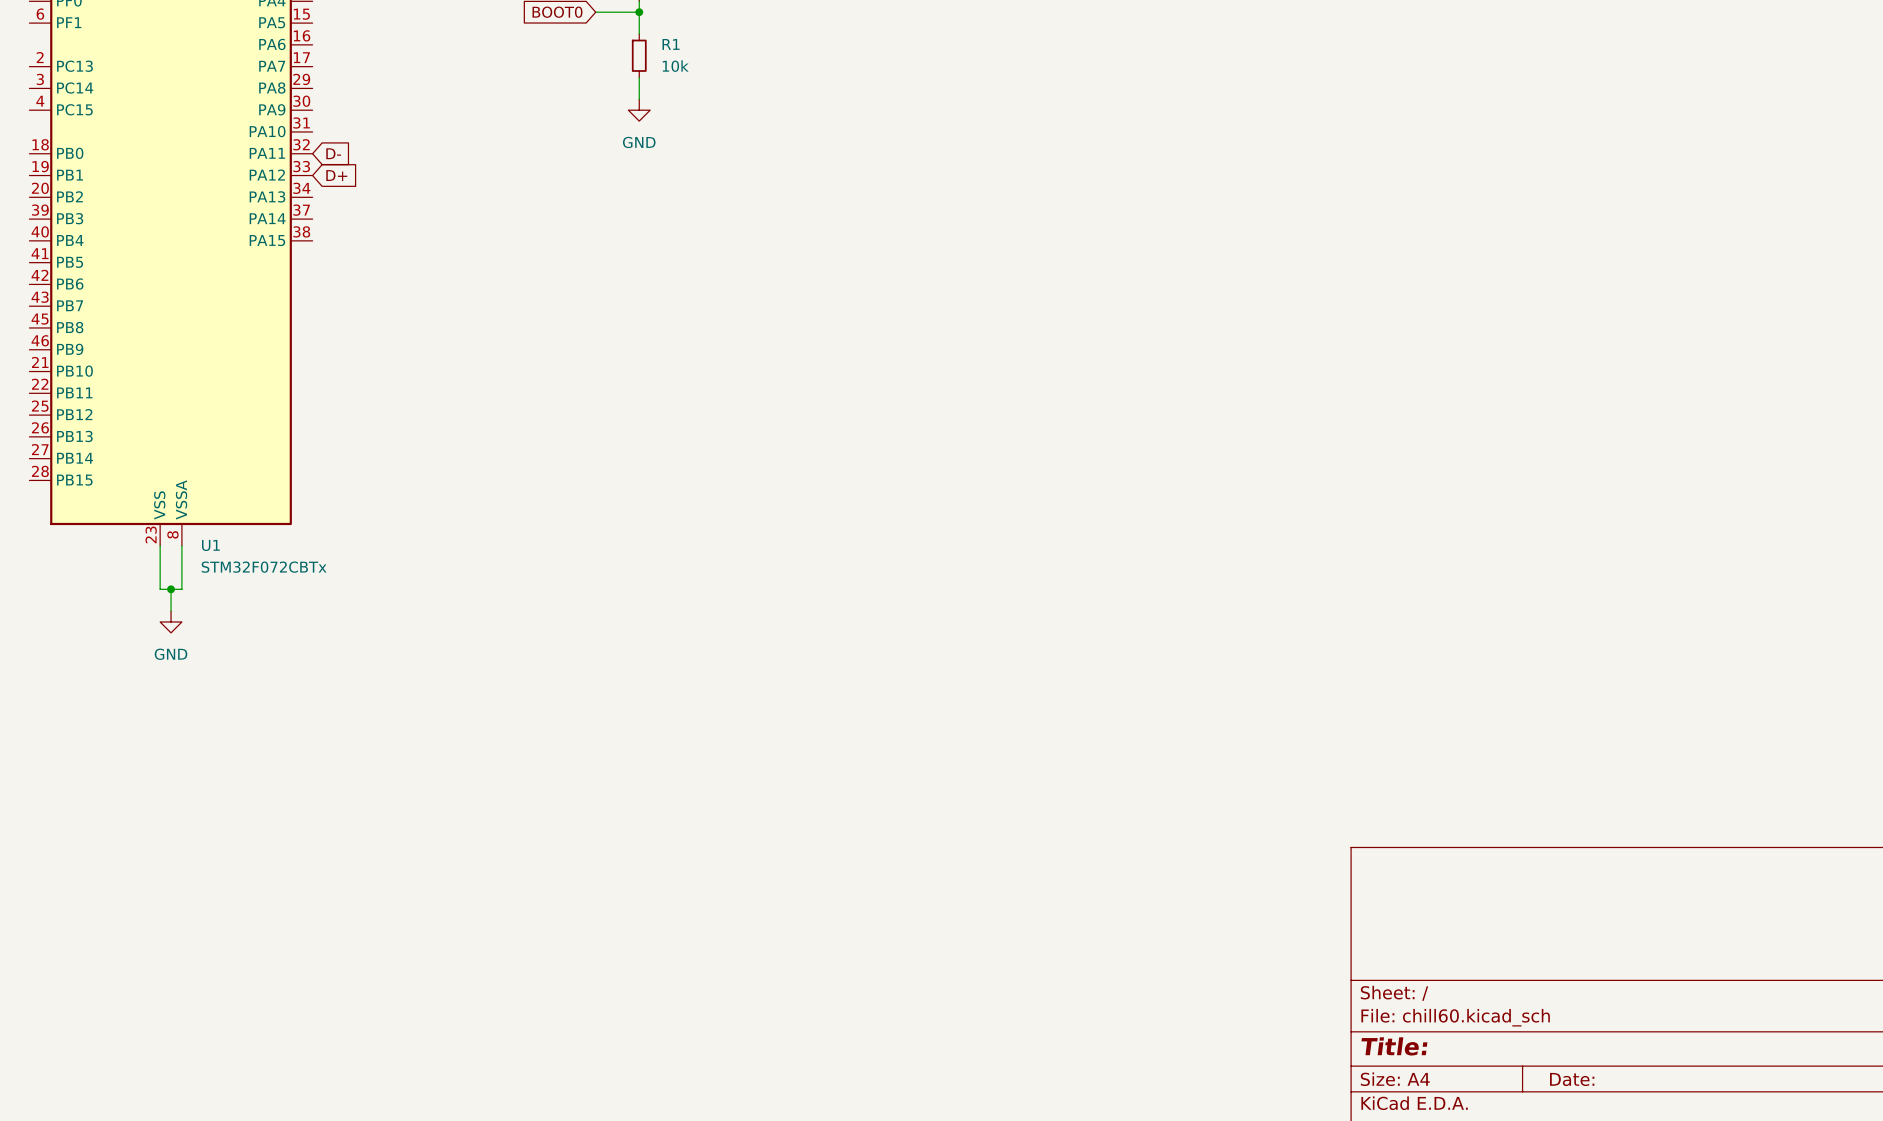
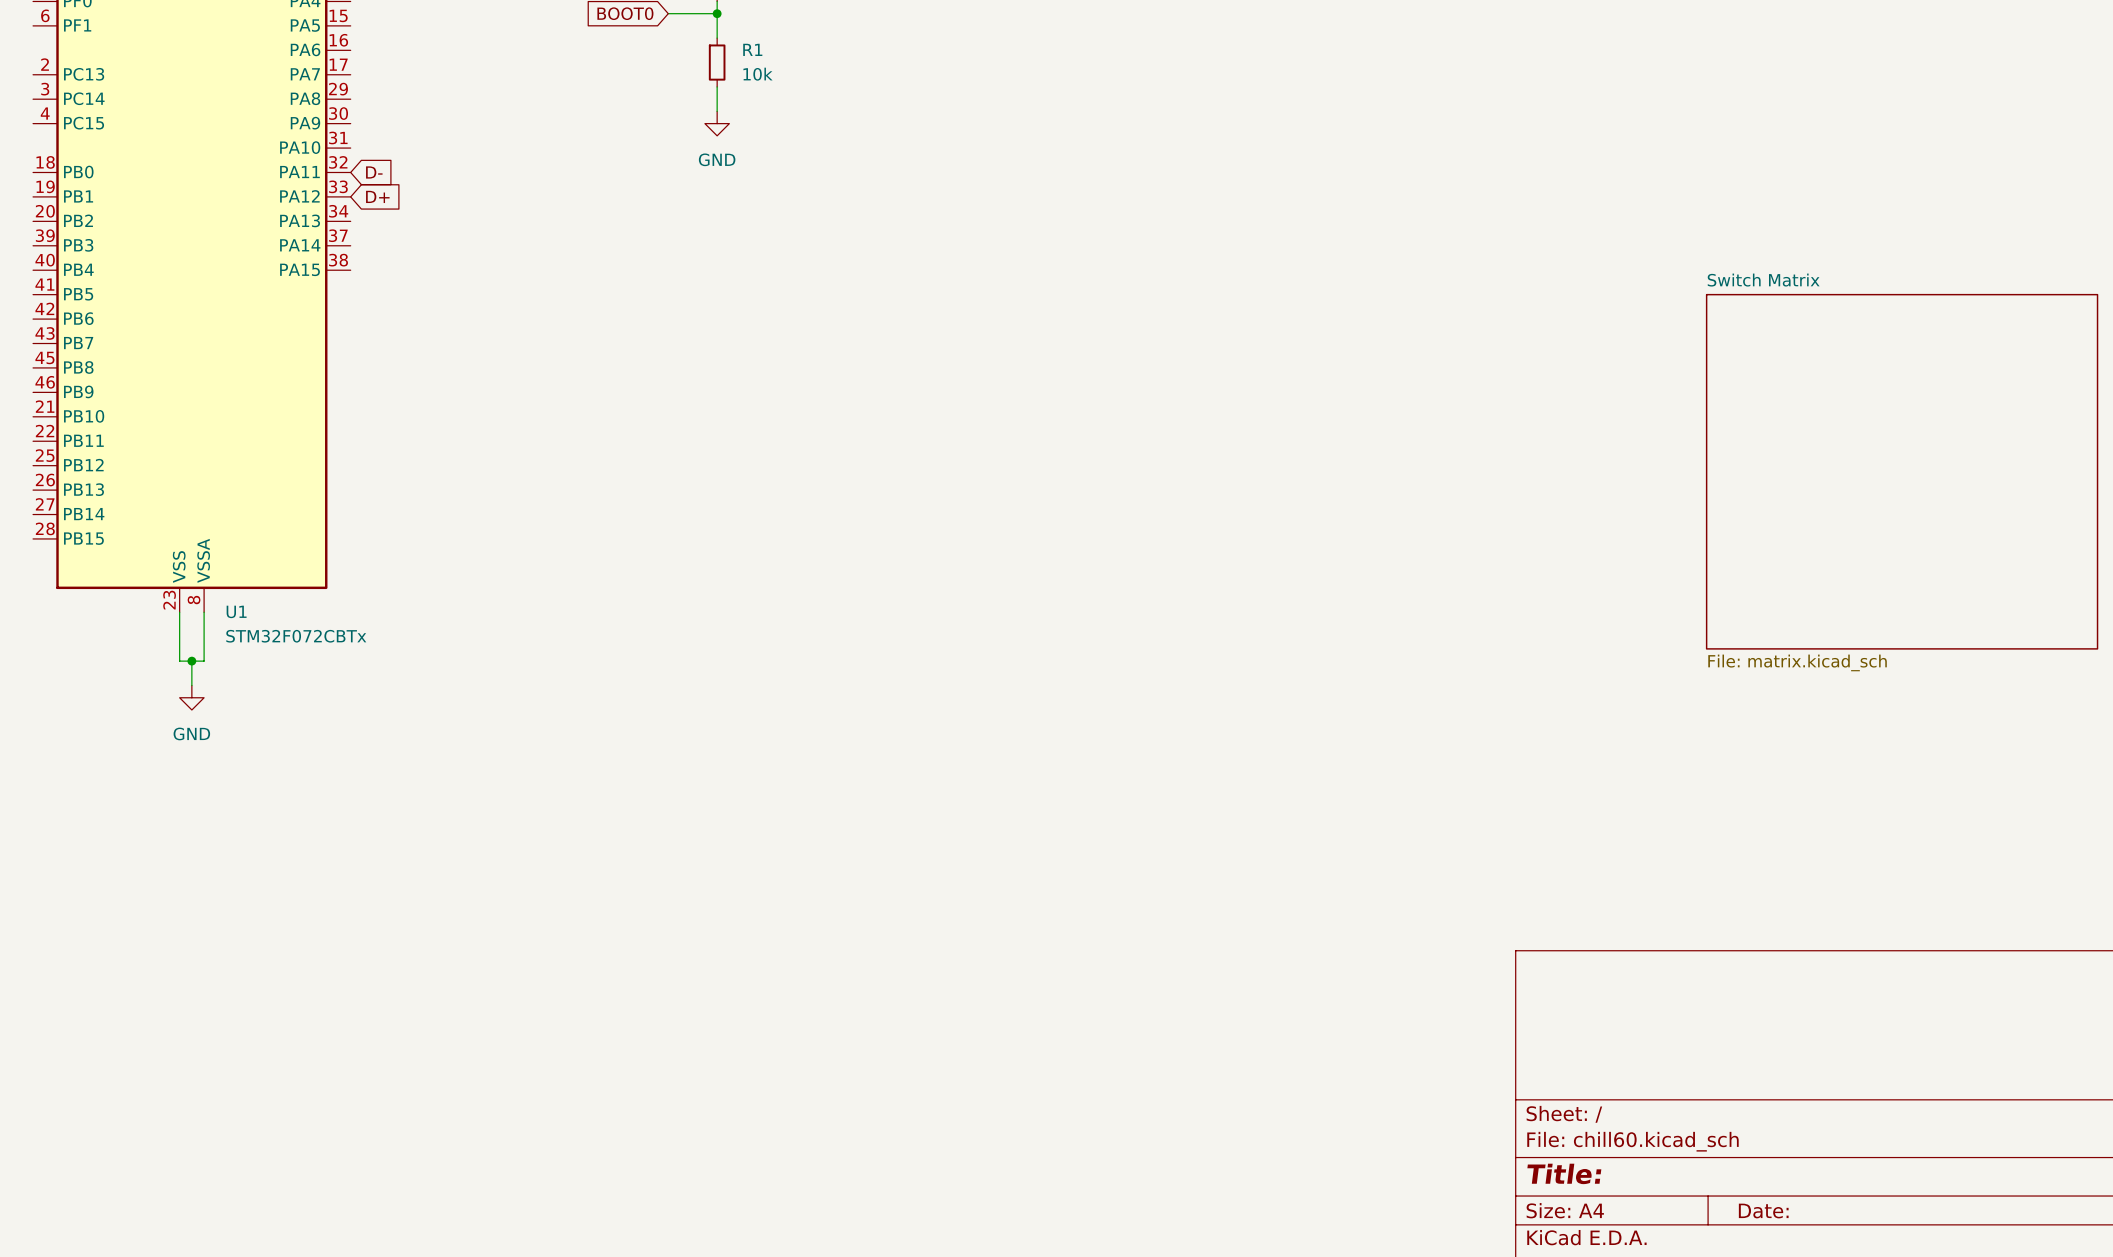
sheet Switch Matrix: none -> File: matrix.kicad_sch (1902, 471)

